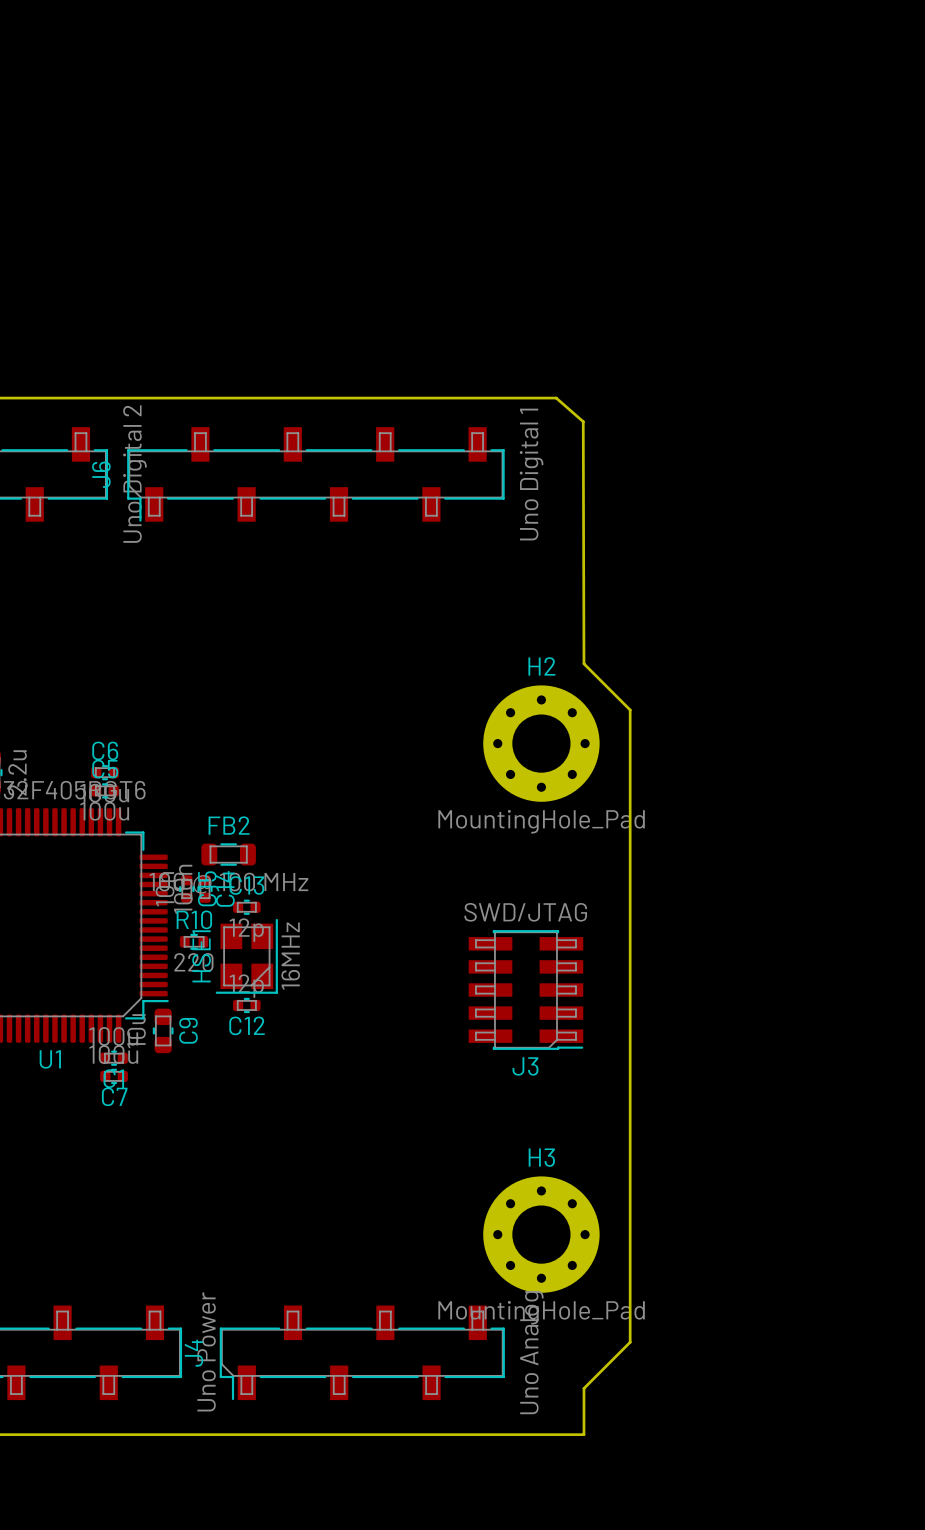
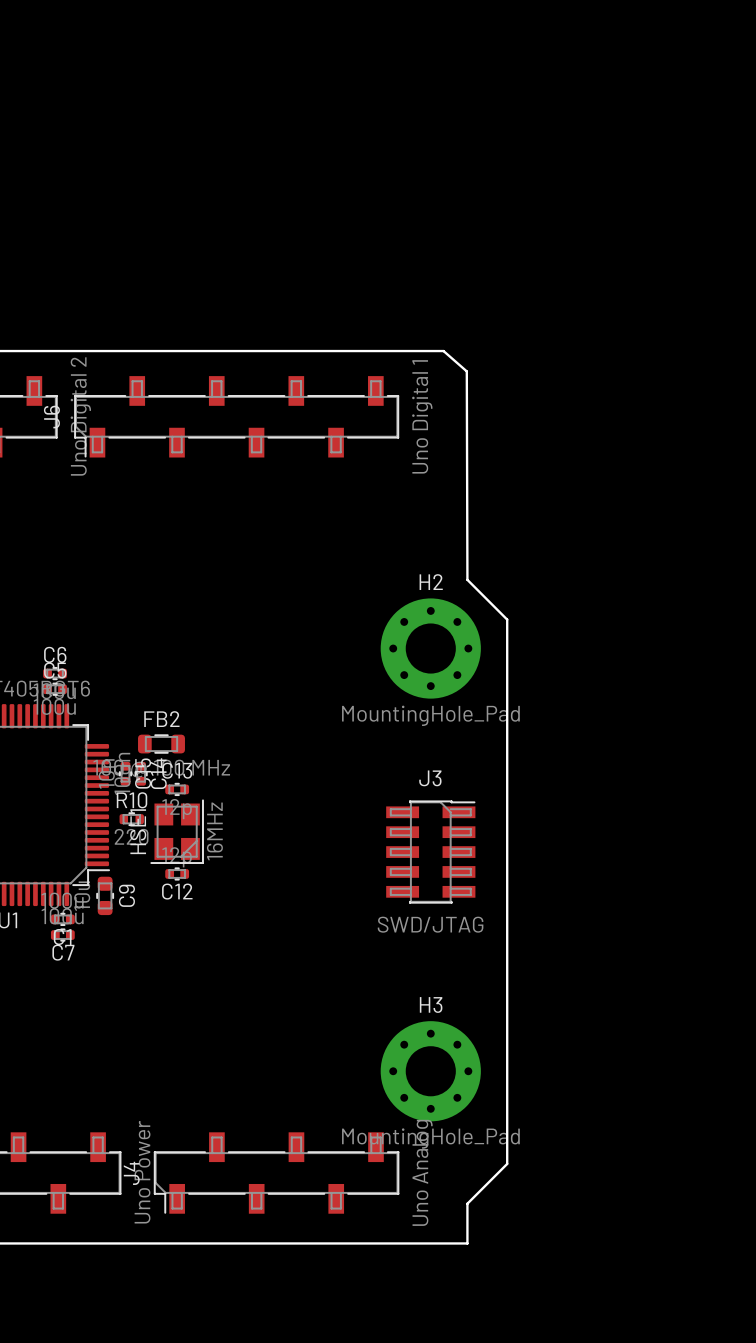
J3 value position: SWD/JTAG (525, 912) -> SWD/JTAG (430, 924)
J3 footprint: [468, 930, 584, 1050] -> [386, 800, 476, 904]
J3 name position: J3 (525, 1066) -> J3 (430, 778)

